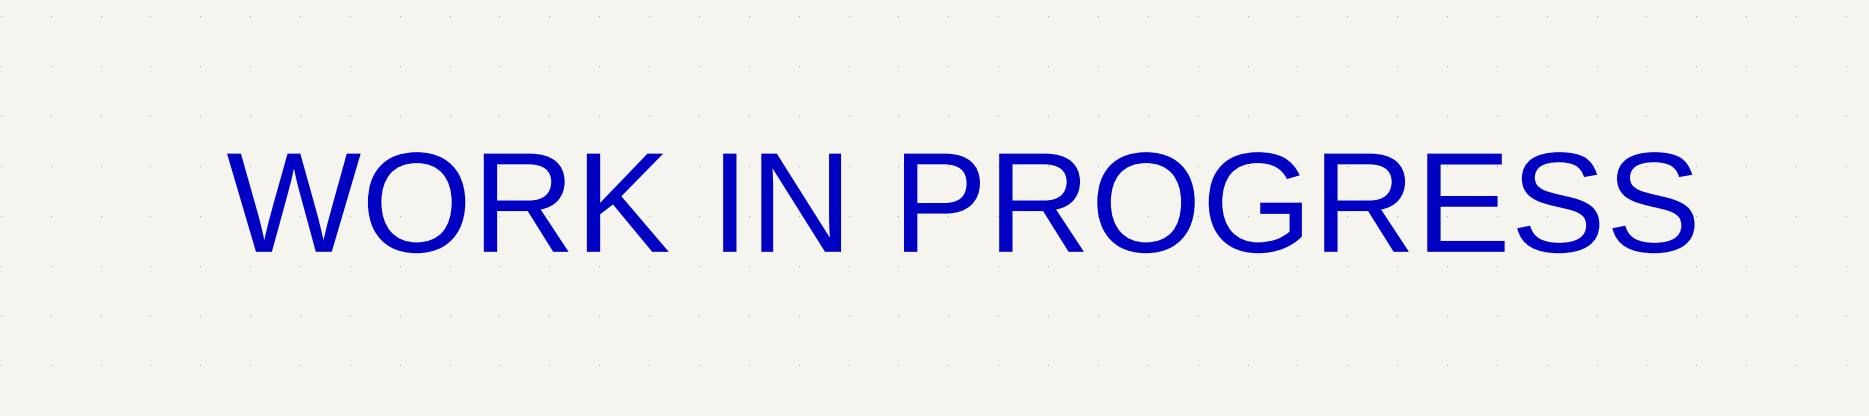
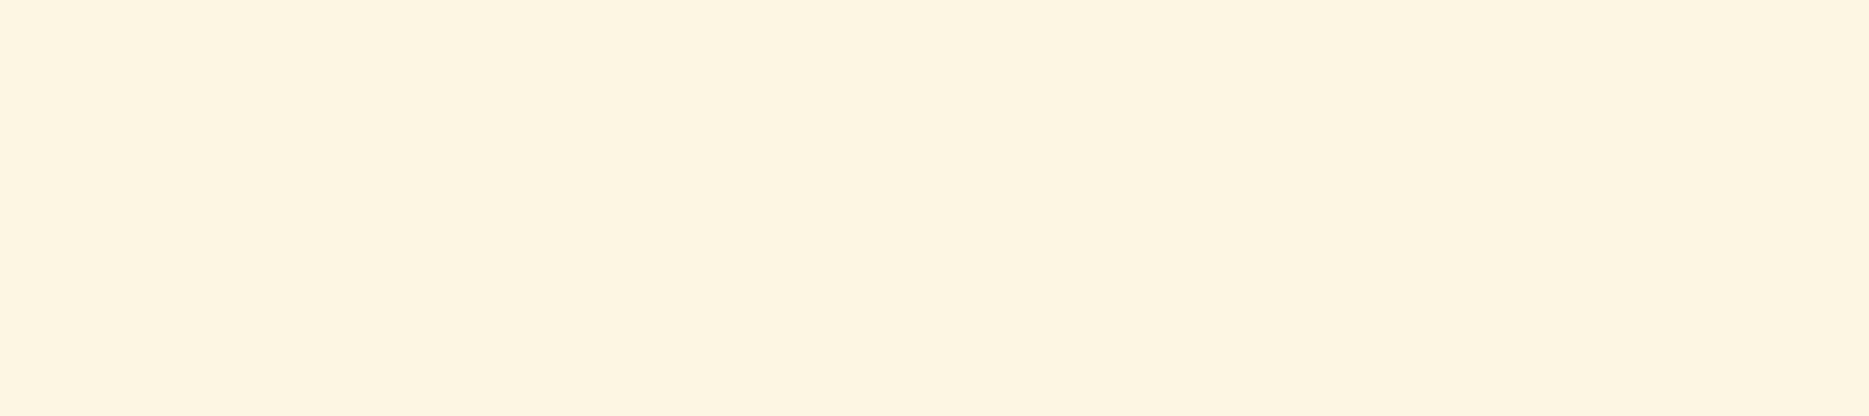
text: WORK IN PROGRESS (960, 202) -> none

